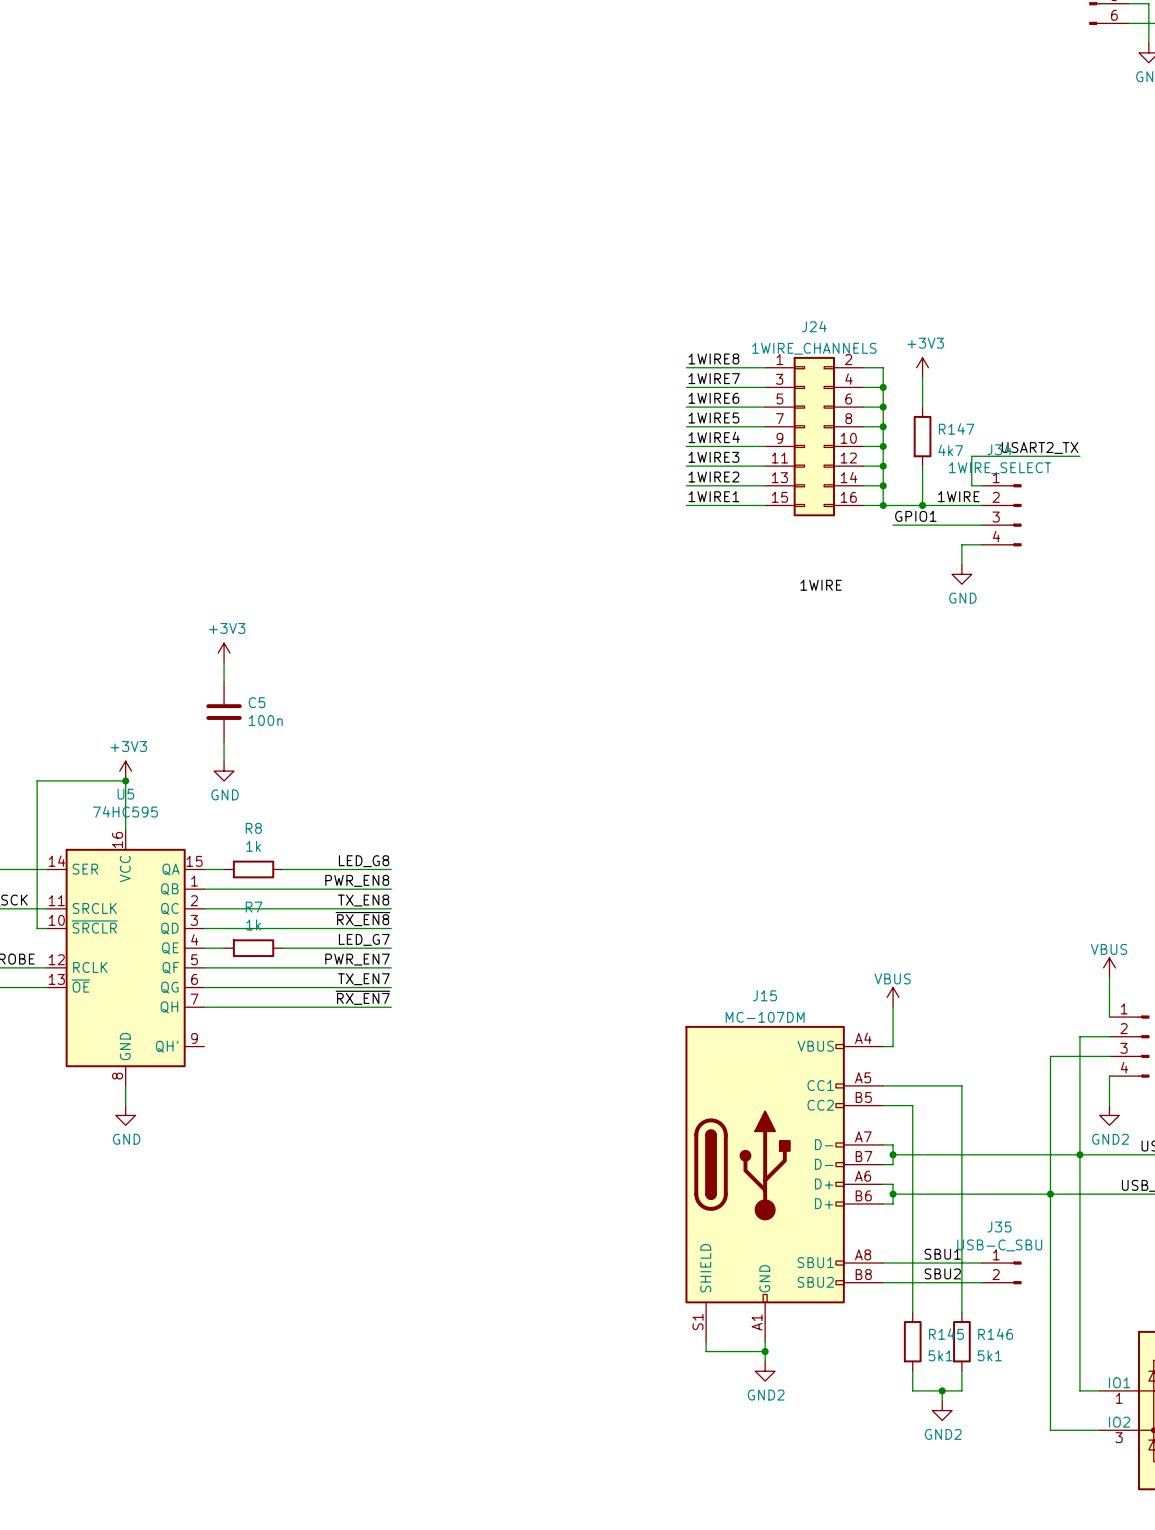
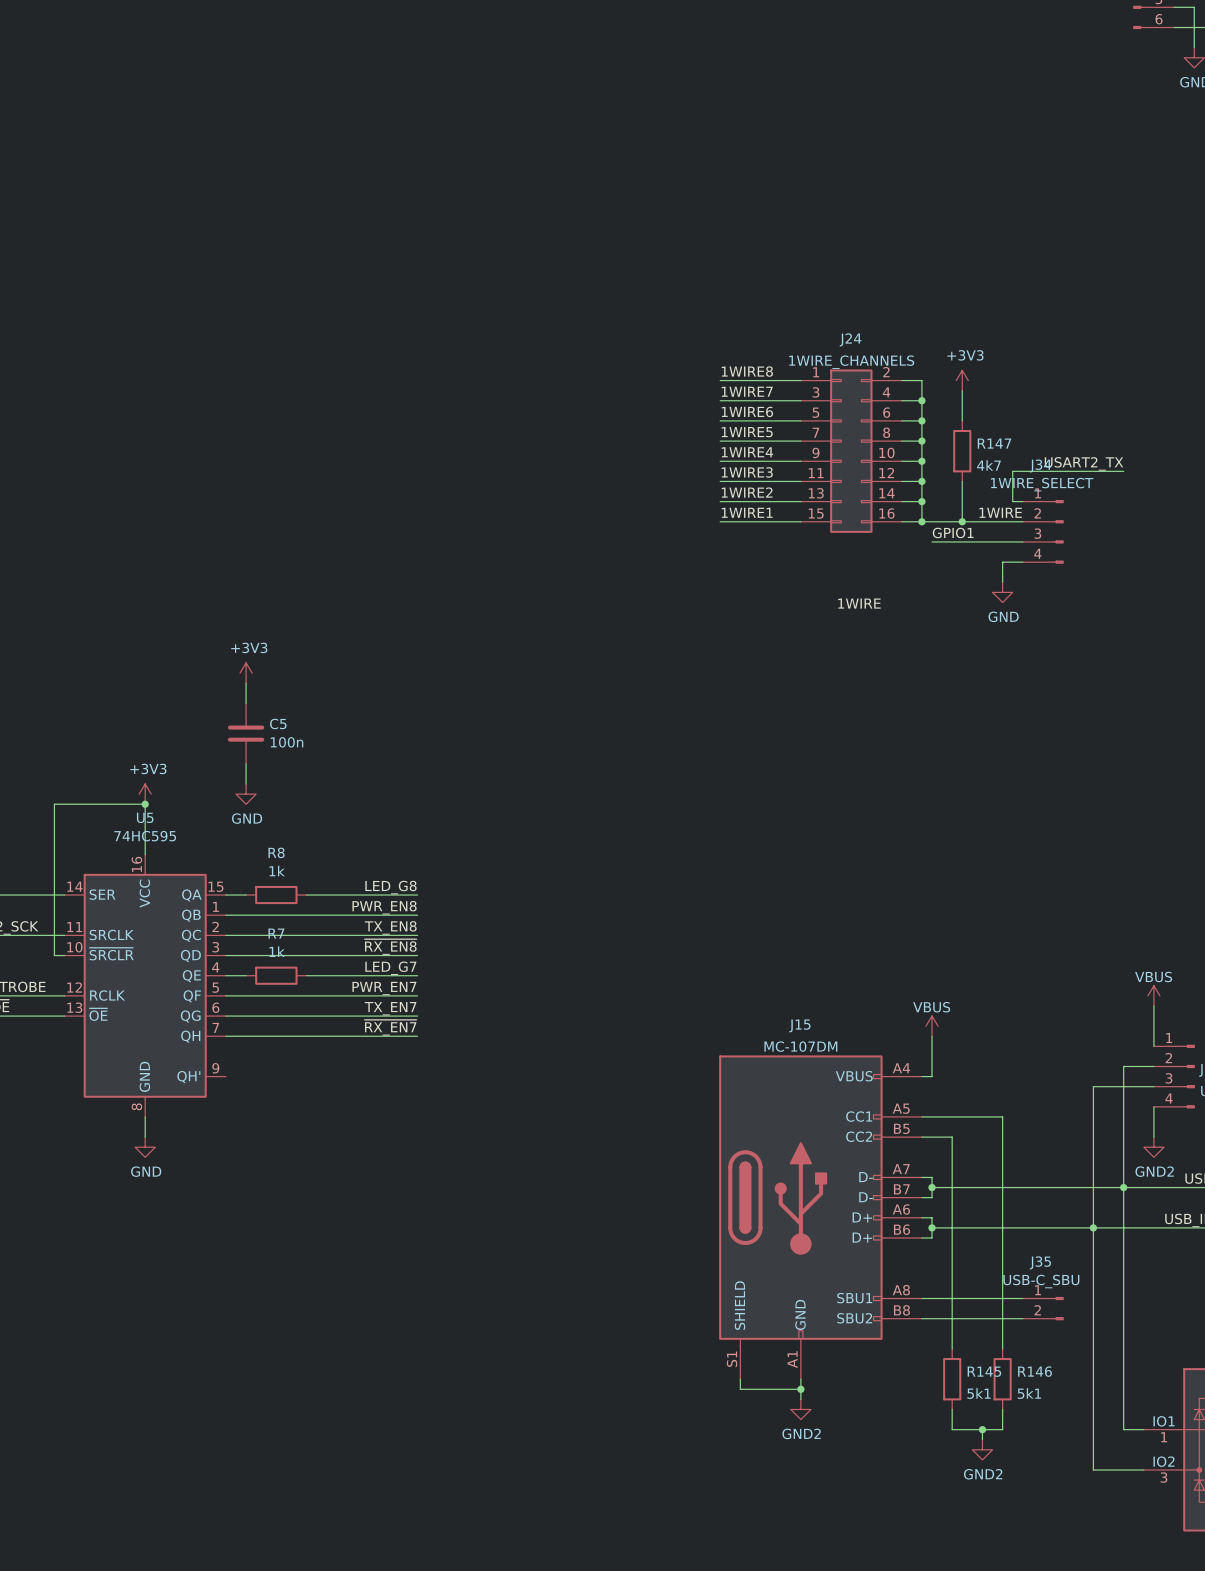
label: SBU1 (942, 1254) -> none
label: SBU2 (942, 1273) -> none

